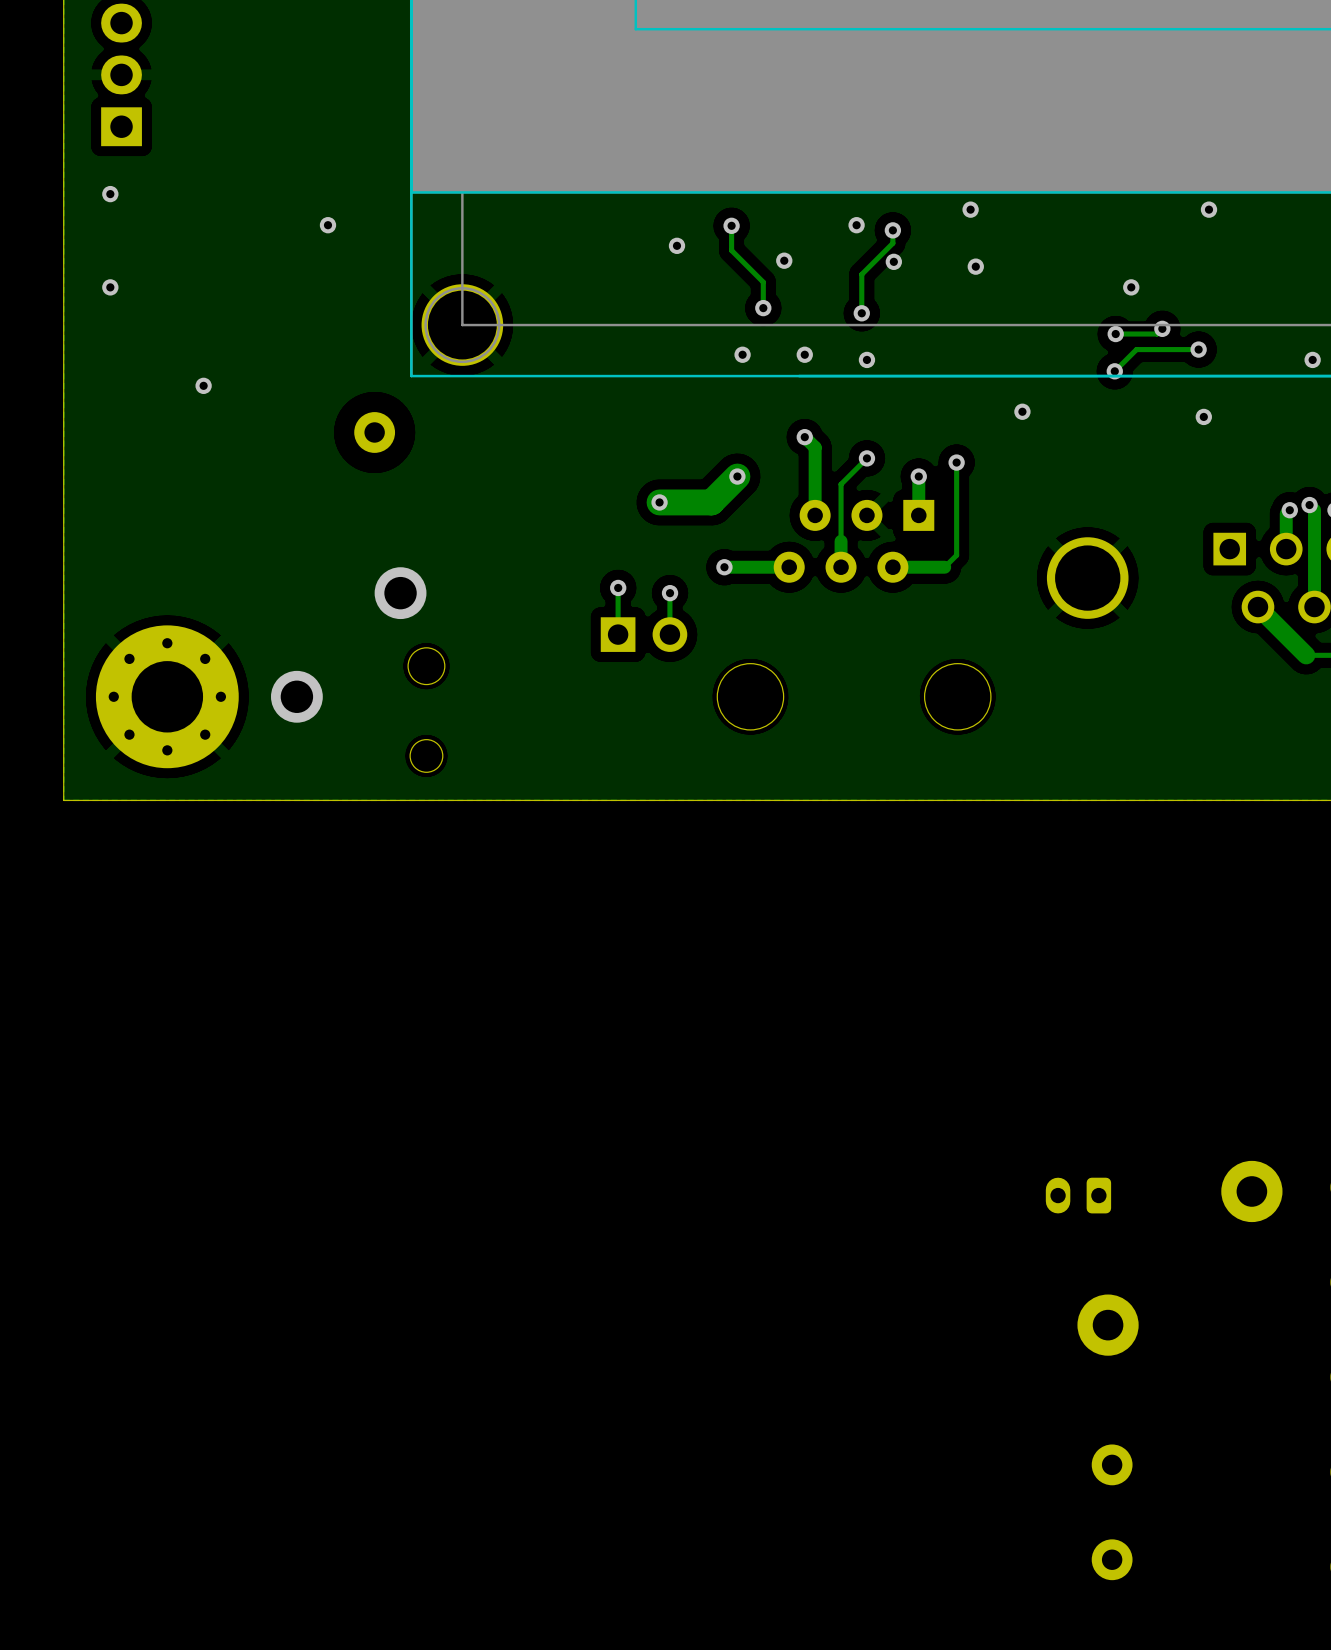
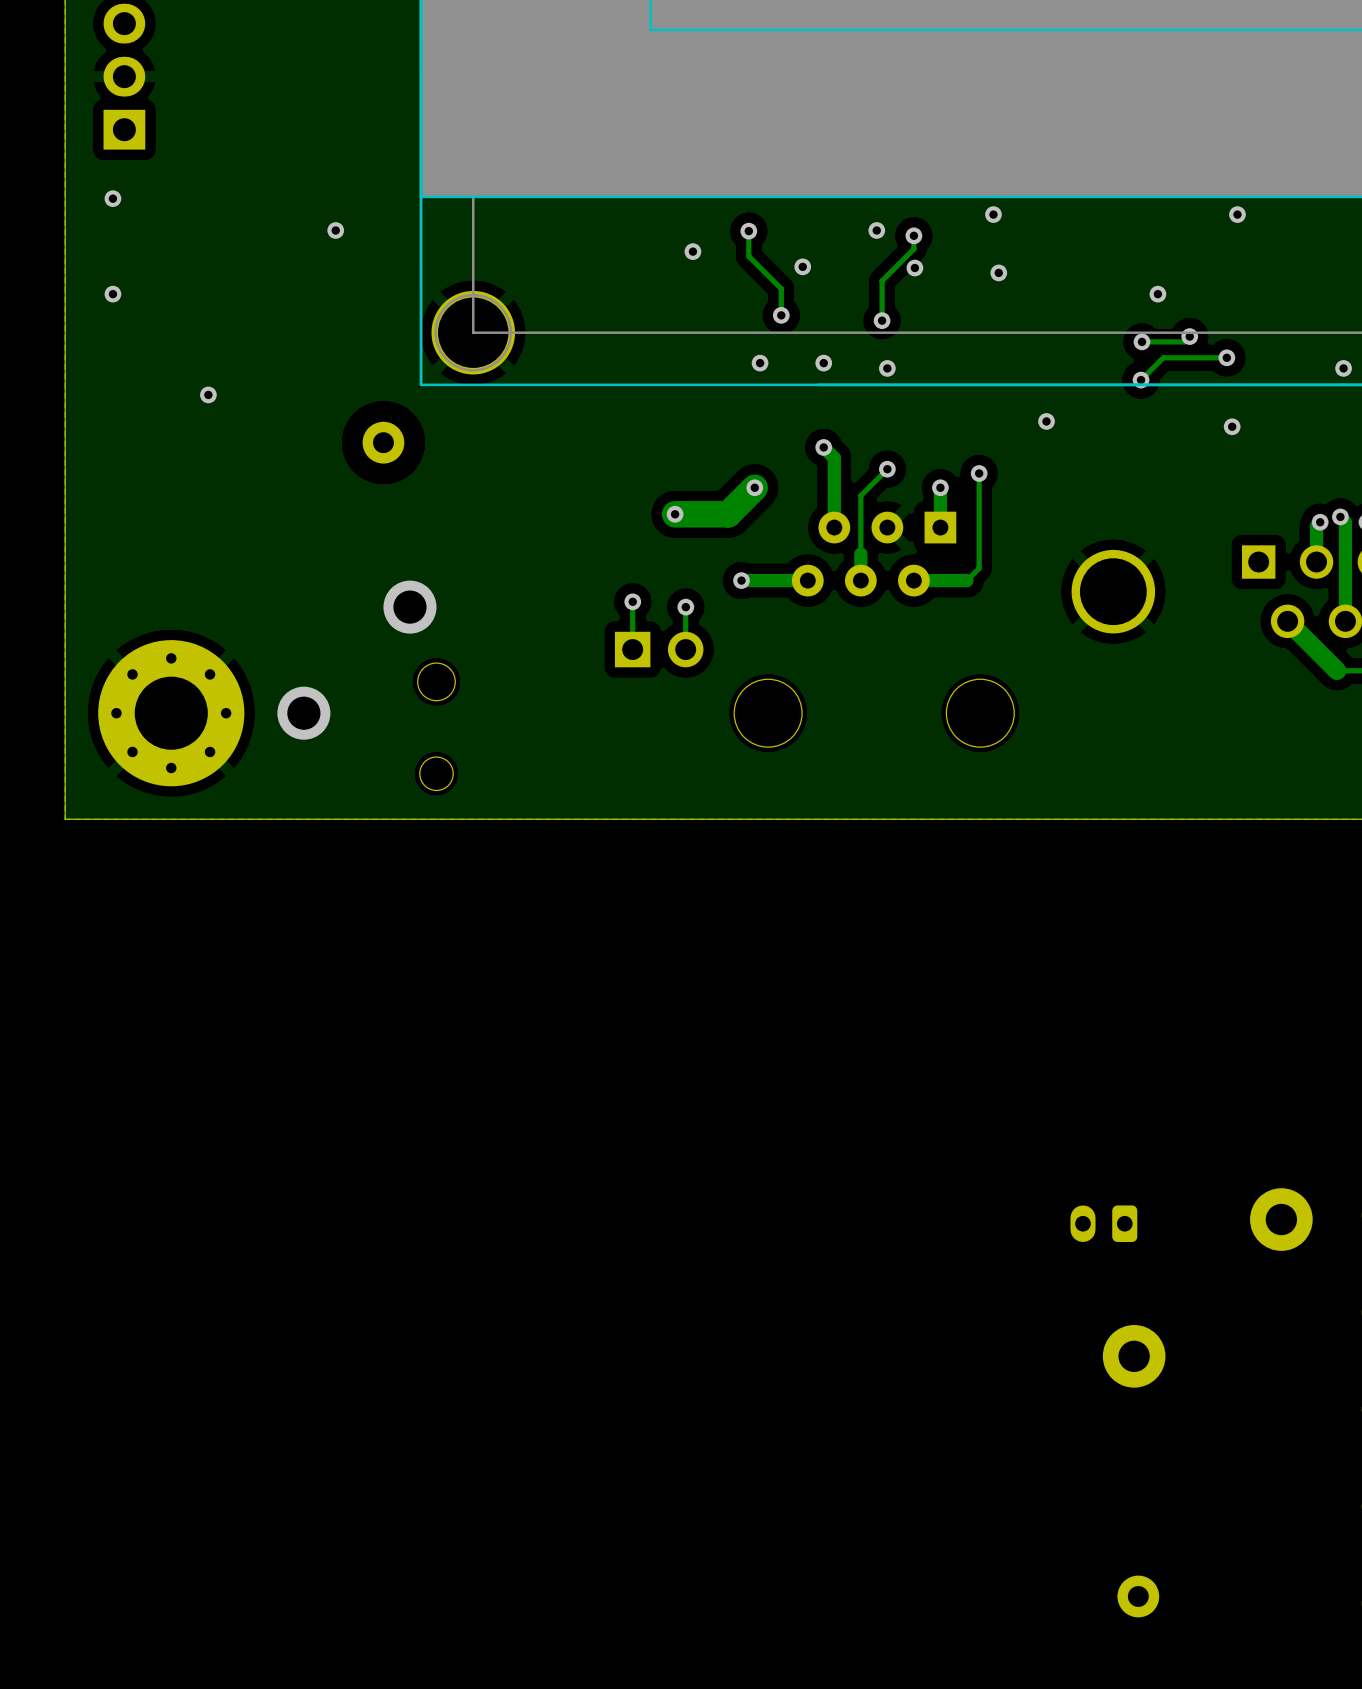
part: (1112, 1464) -> none

